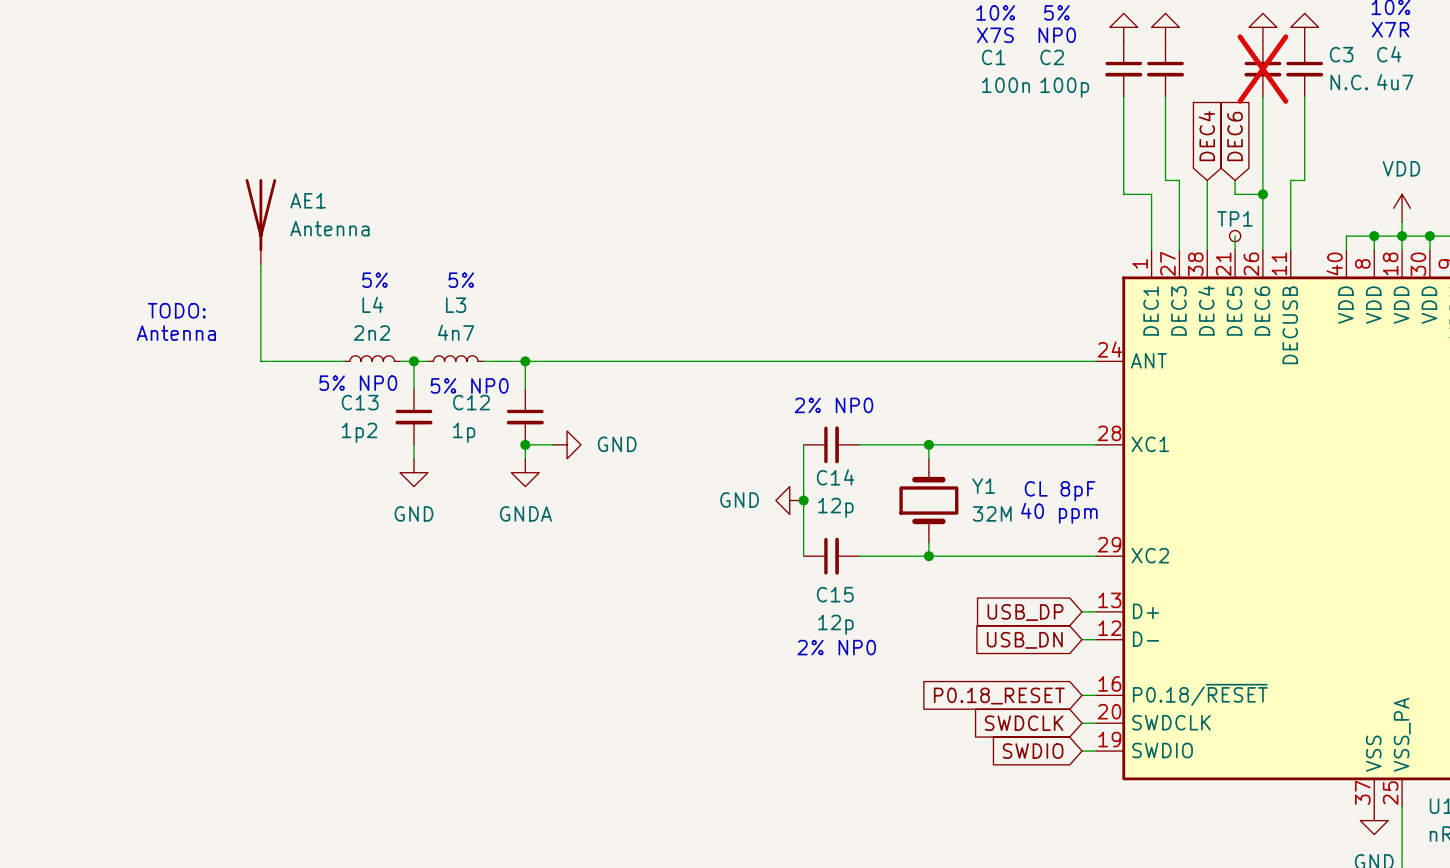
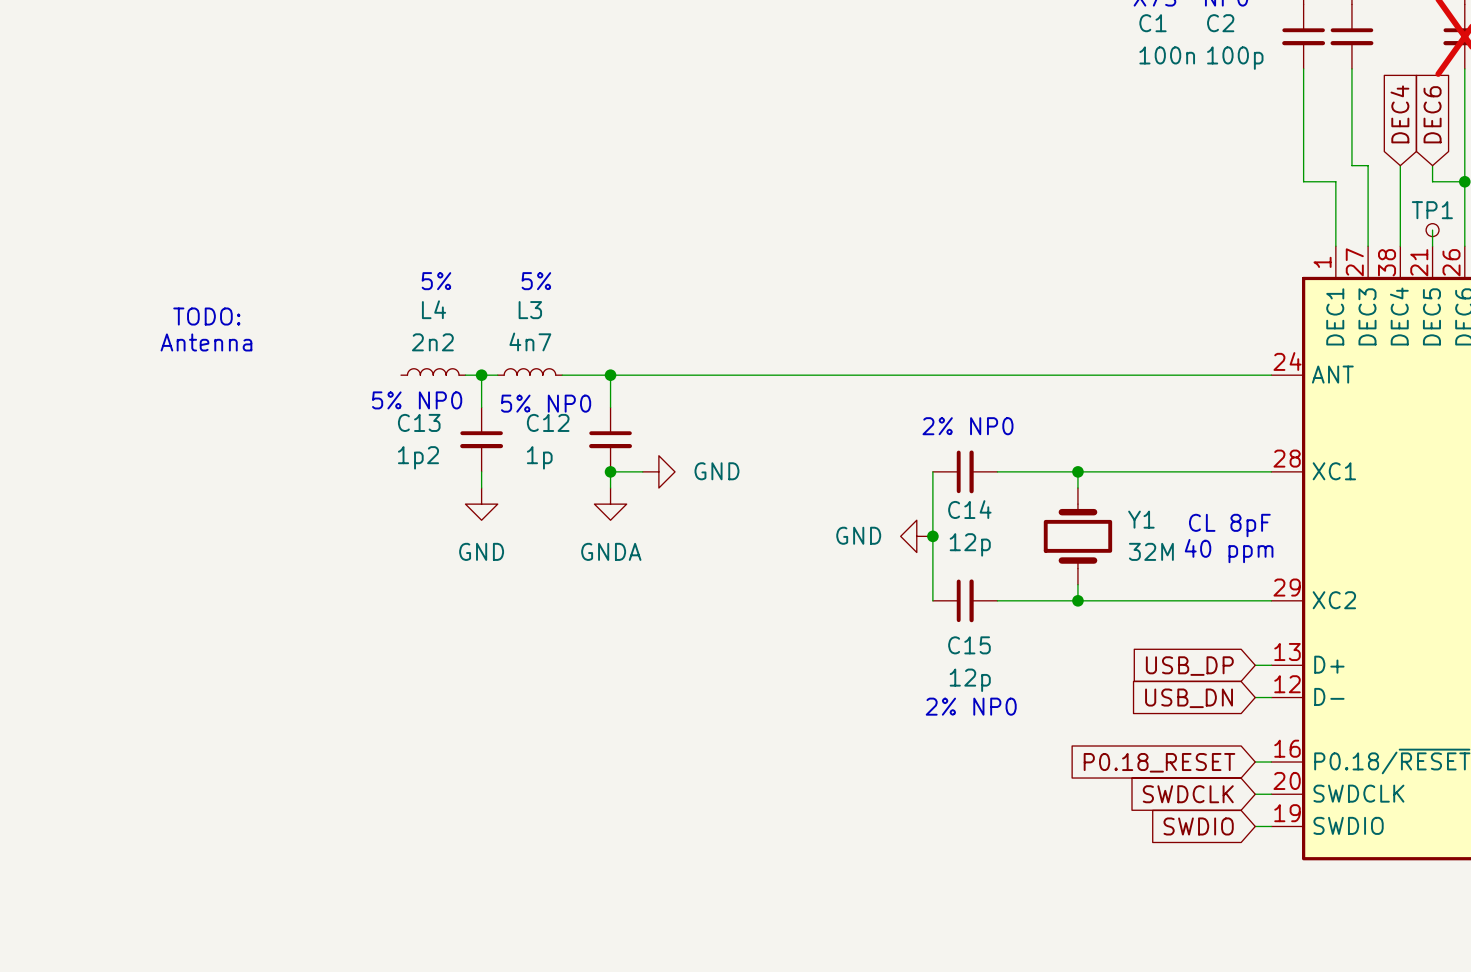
AE1: Antenna (260, 221) -> none
wire: (260, 263) (260, 361) (344, 361) -> none

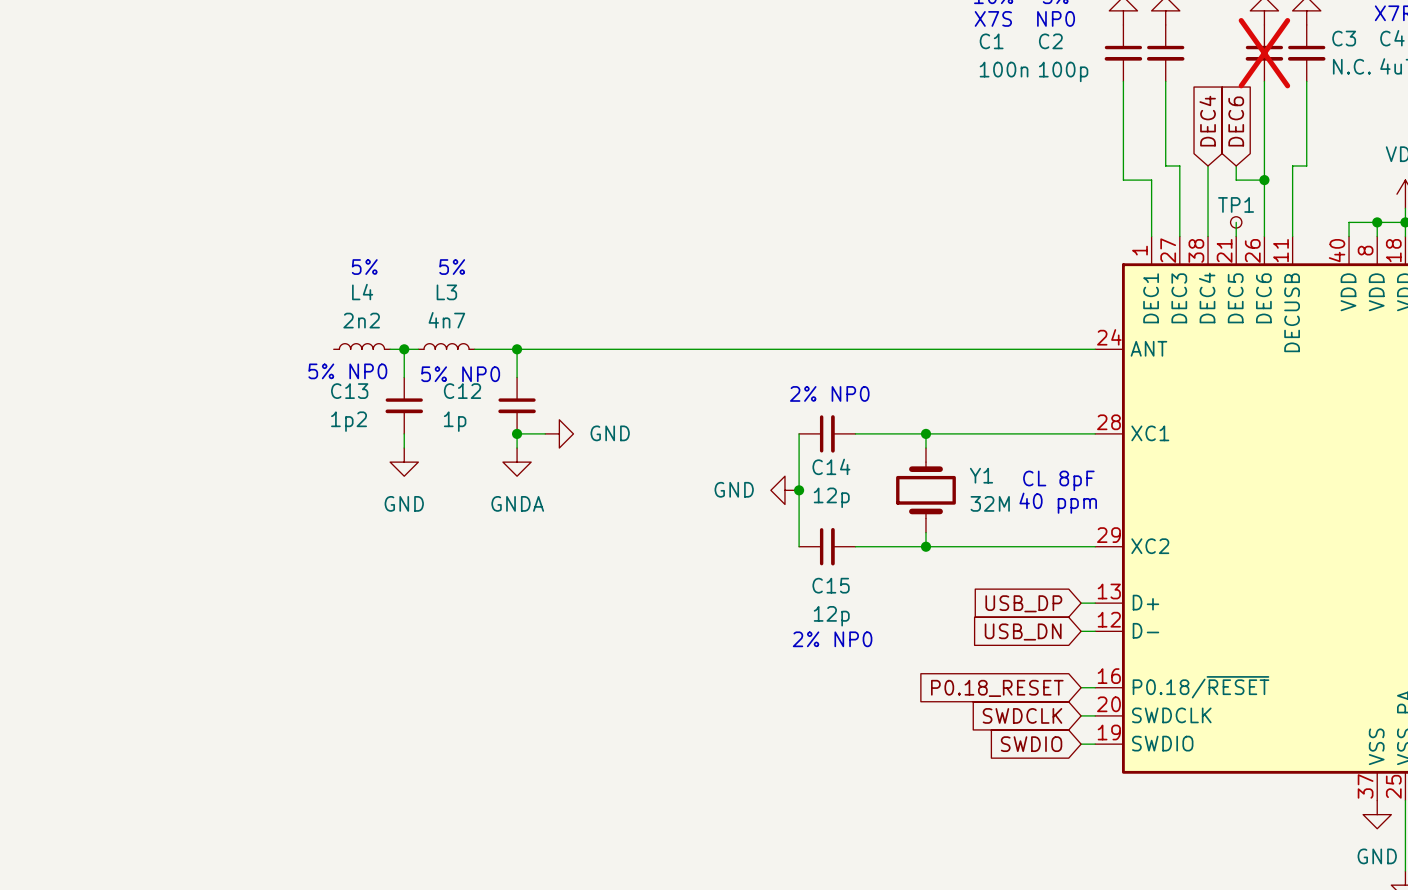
text: TODO: (206, 316) -> none
text: Antenna (206, 342) -> none

